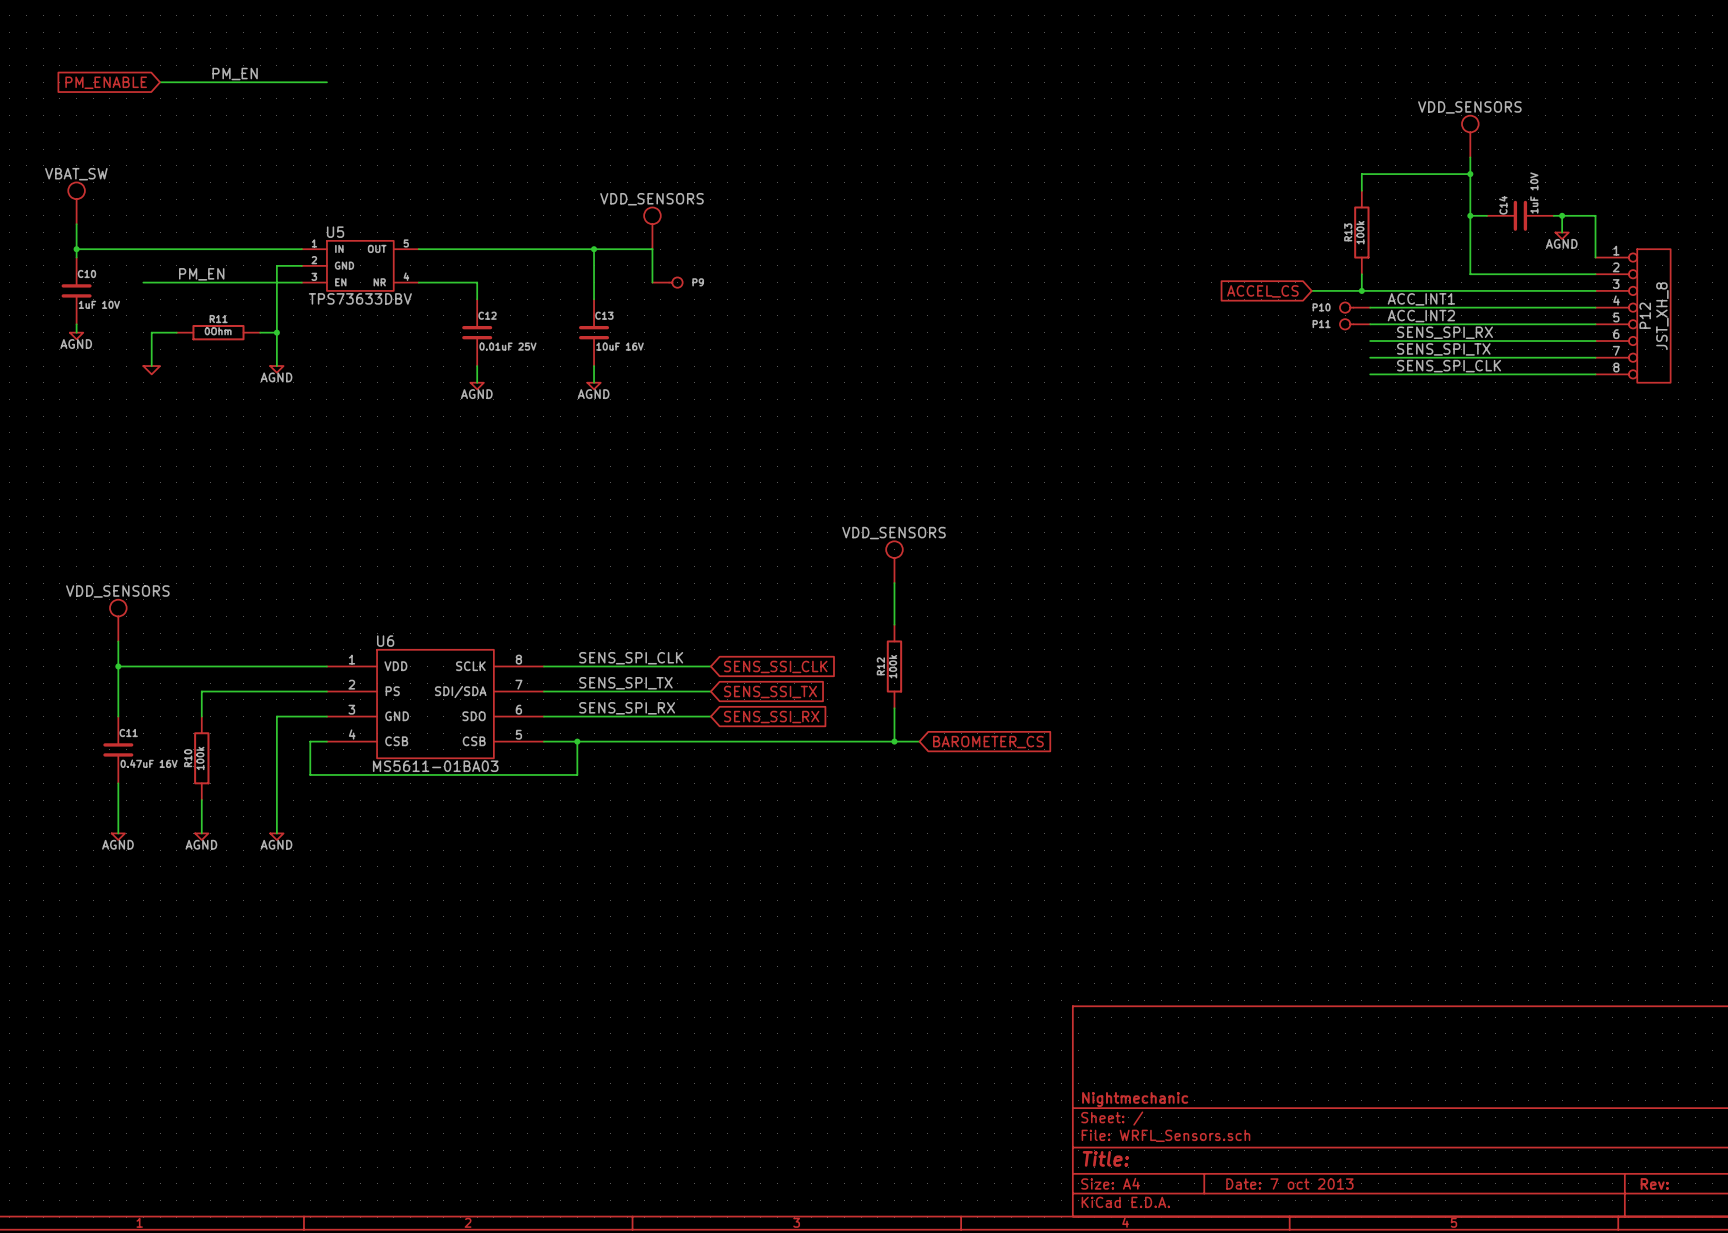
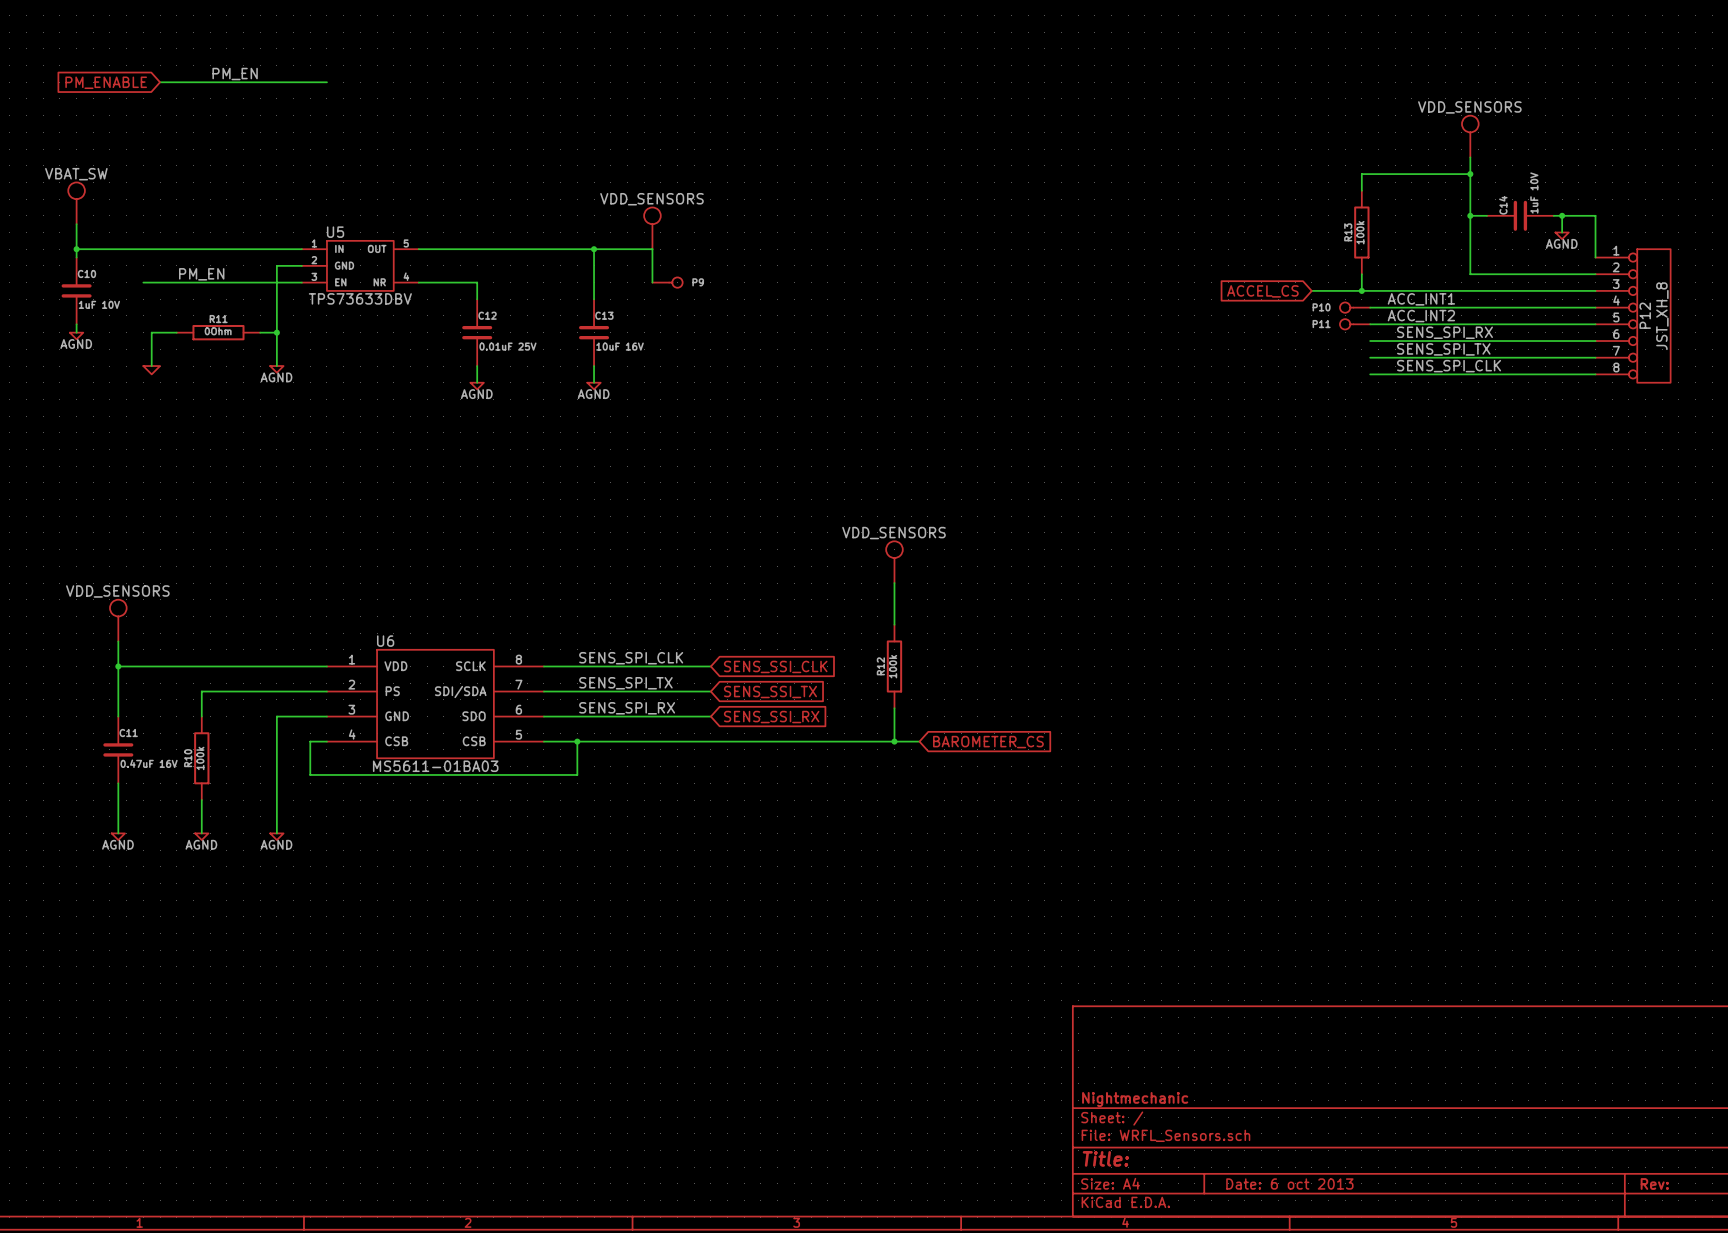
title block: Date: 7 oct 2013 (1289, 1183) -> Date: 6 oct 2013 (1289, 1183)

